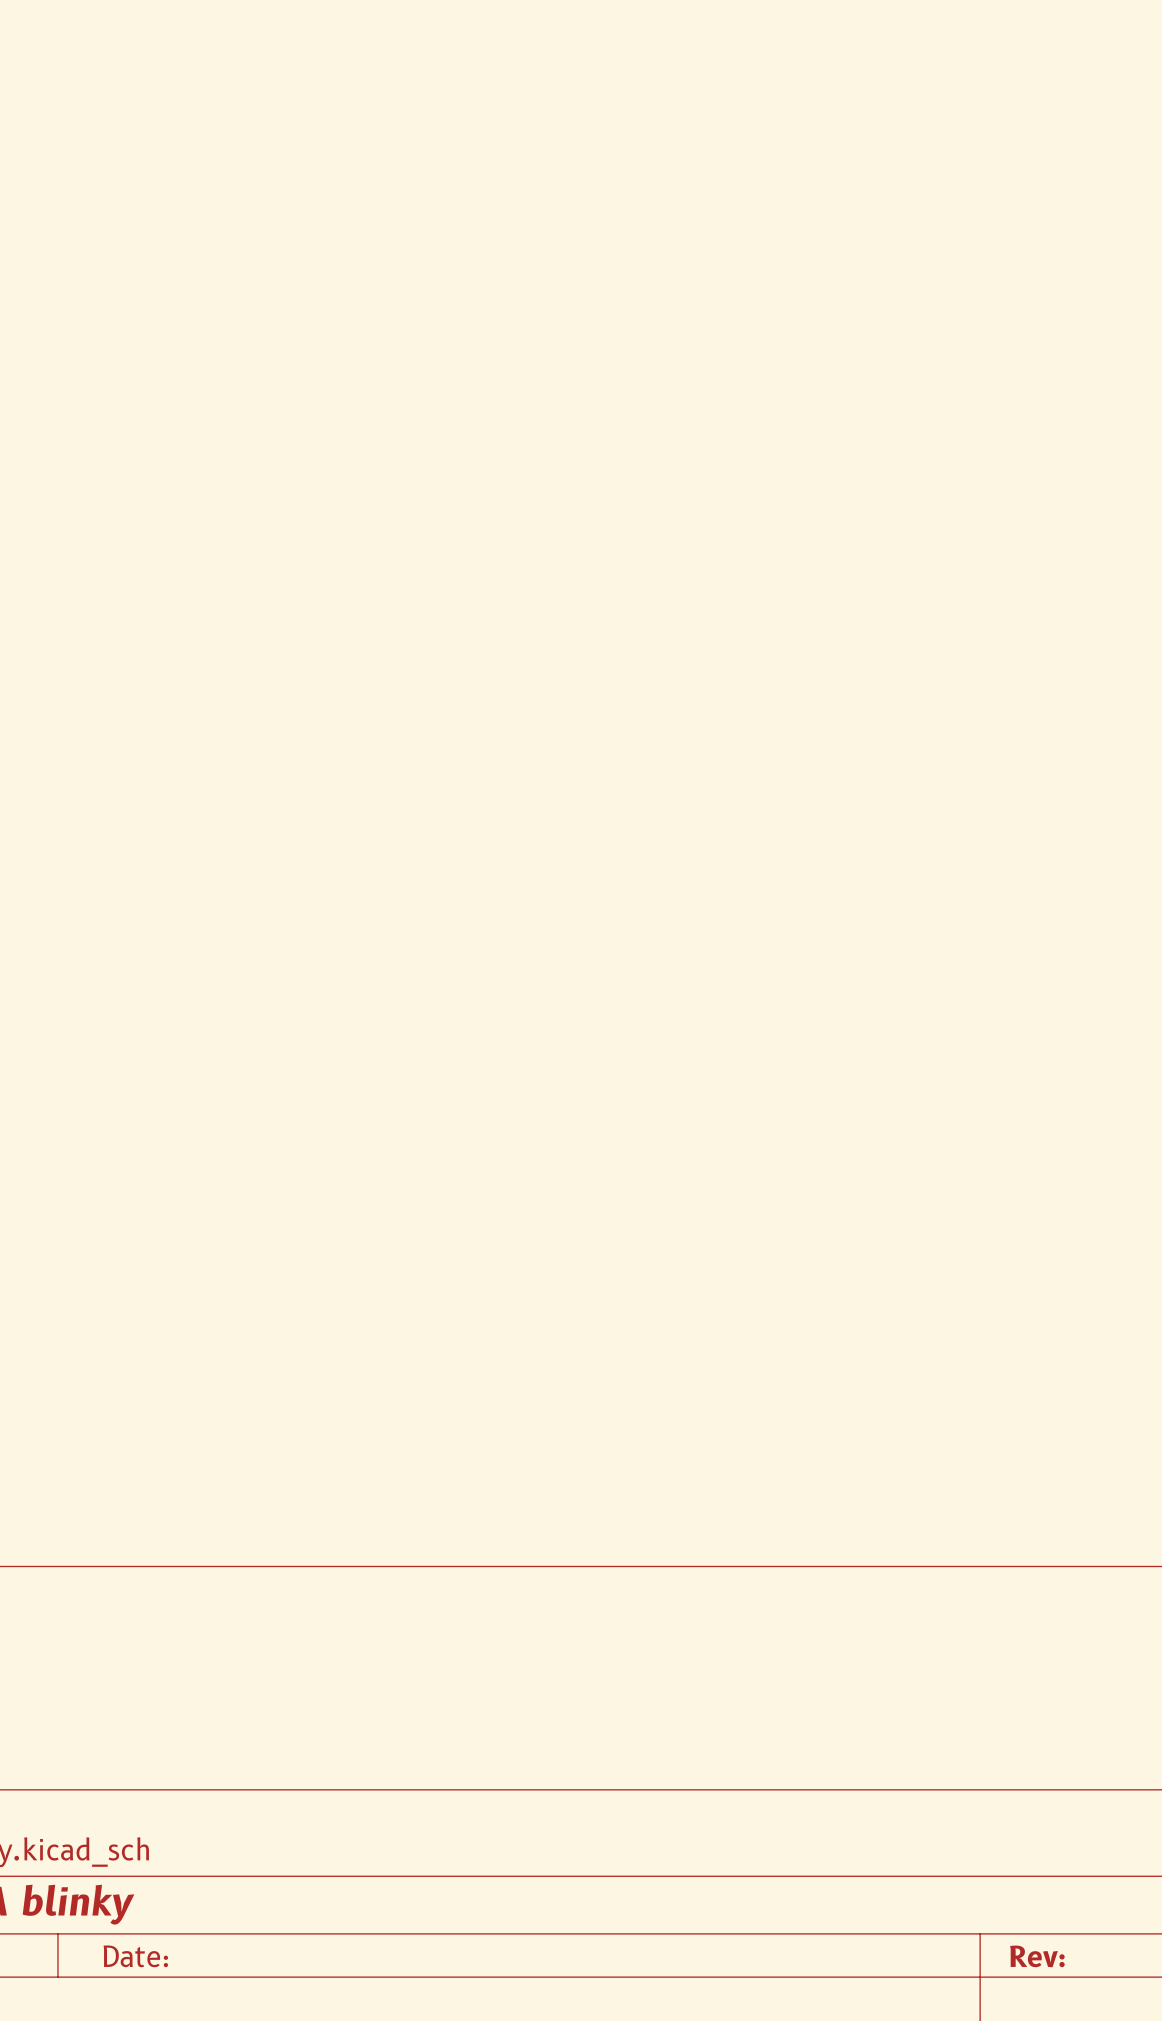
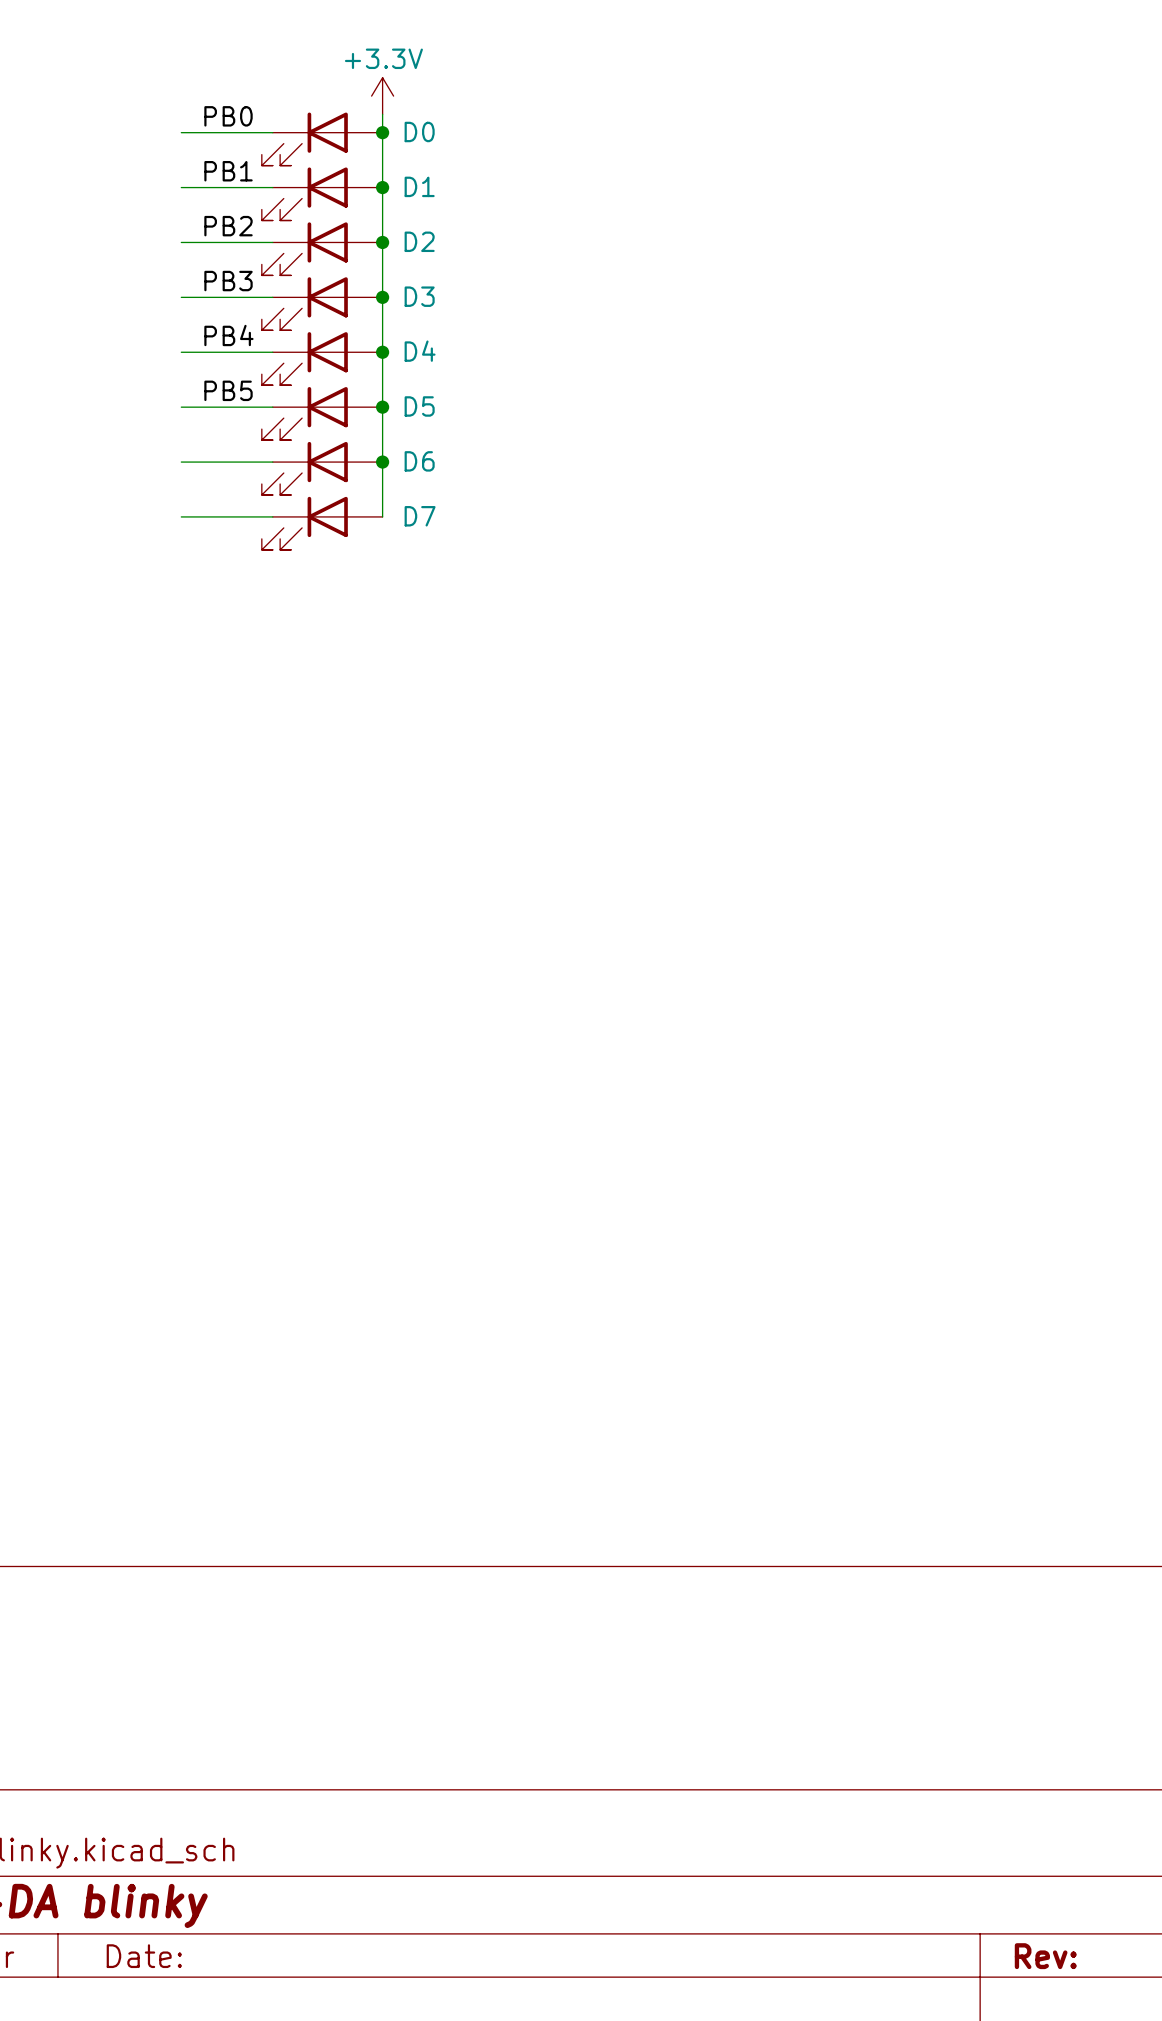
power symbol: none -> +3.3V (382, 96)
wire: none -> (382, 114) (382, 516)
label: none -> PB0 (228, 116)
wire: none -> (181, 132) (272, 132)
junction: none -> (382, 132)
D0: none -> (322, 139)
label: none -> PB1 (228, 171)
wire: none -> (181, 187) (272, 187)
junction: none -> (382, 187)
D1: none -> (322, 193)
label: none -> PB2 (228, 226)
wire: none -> (181, 242) (272, 242)
junction: none -> (382, 242)
D2: none -> (322, 248)
label: none -> PB3 (228, 281)
wire: none -> (181, 297) (272, 297)
junction: none -> (382, 297)
D3: none -> (322, 303)
label: none -> PB4 (228, 335)
wire: none -> (181, 352) (272, 352)
junction: none -> (382, 352)
D4: none -> (322, 358)
label: none -> PB5 (228, 390)
wire: none -> (181, 407) (272, 407)
junction: none -> (382, 407)
D5: none -> (322, 413)
wire: none -> (181, 462) (272, 462)
junction: none -> (382, 462)
D6: none -> (322, 468)
wire: none -> (181, 516) (272, 516)
D7: none -> (322, 523)

